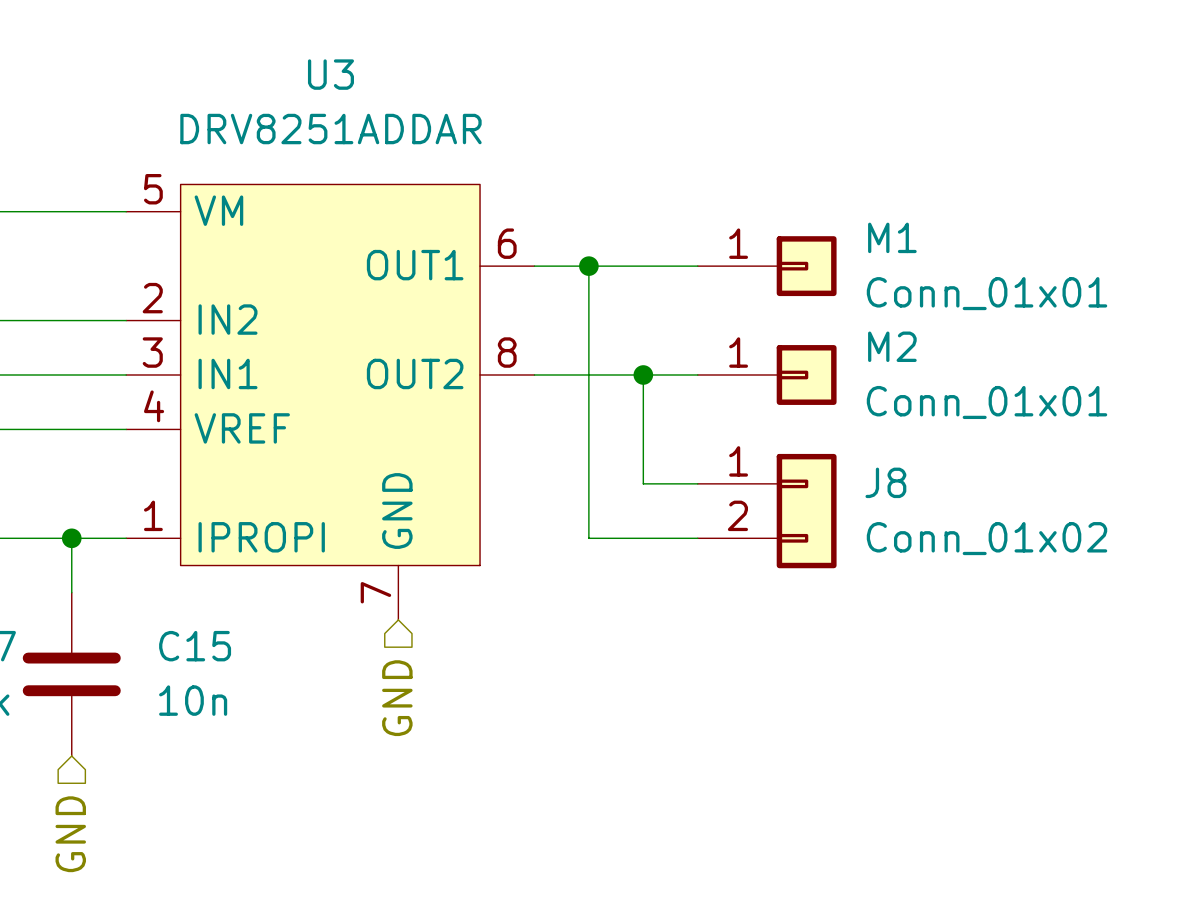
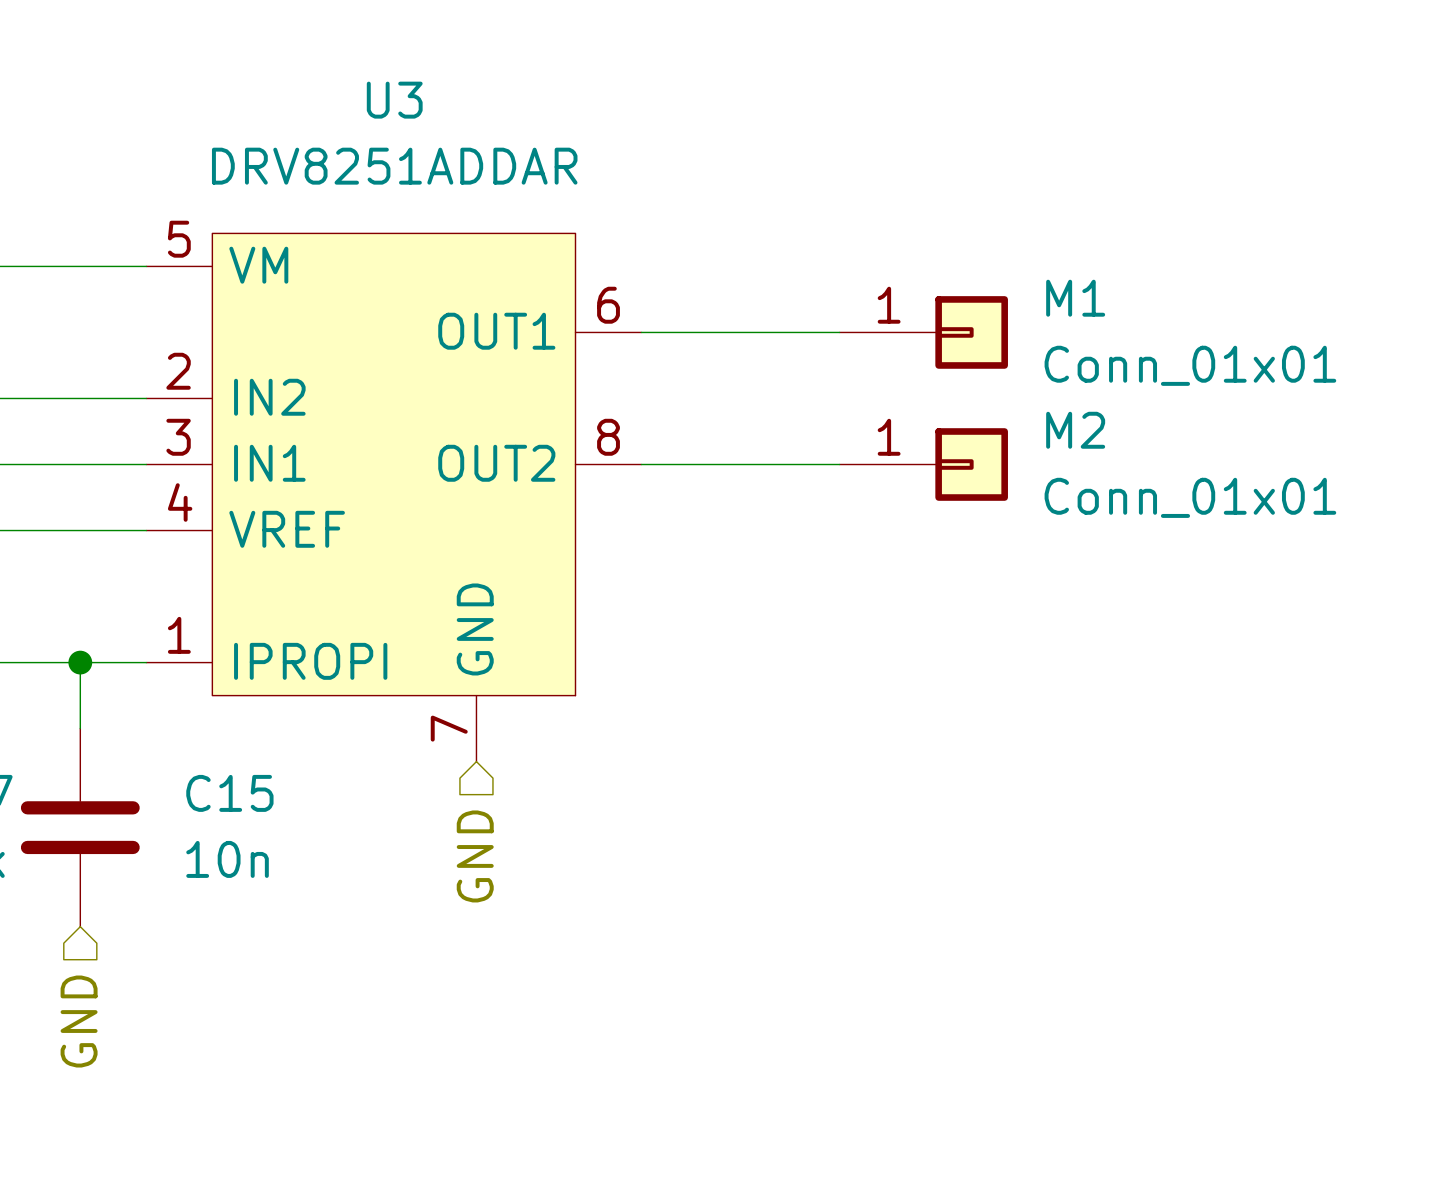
wire: (588, 266) (588, 538) (697, 538) -> none
junction: (588, 266) -> none
wire: (643, 375) (643, 483) (697, 483) -> none
junction: (643, 375) -> none
J8: Conn_01x02 (767, 511) -> none

